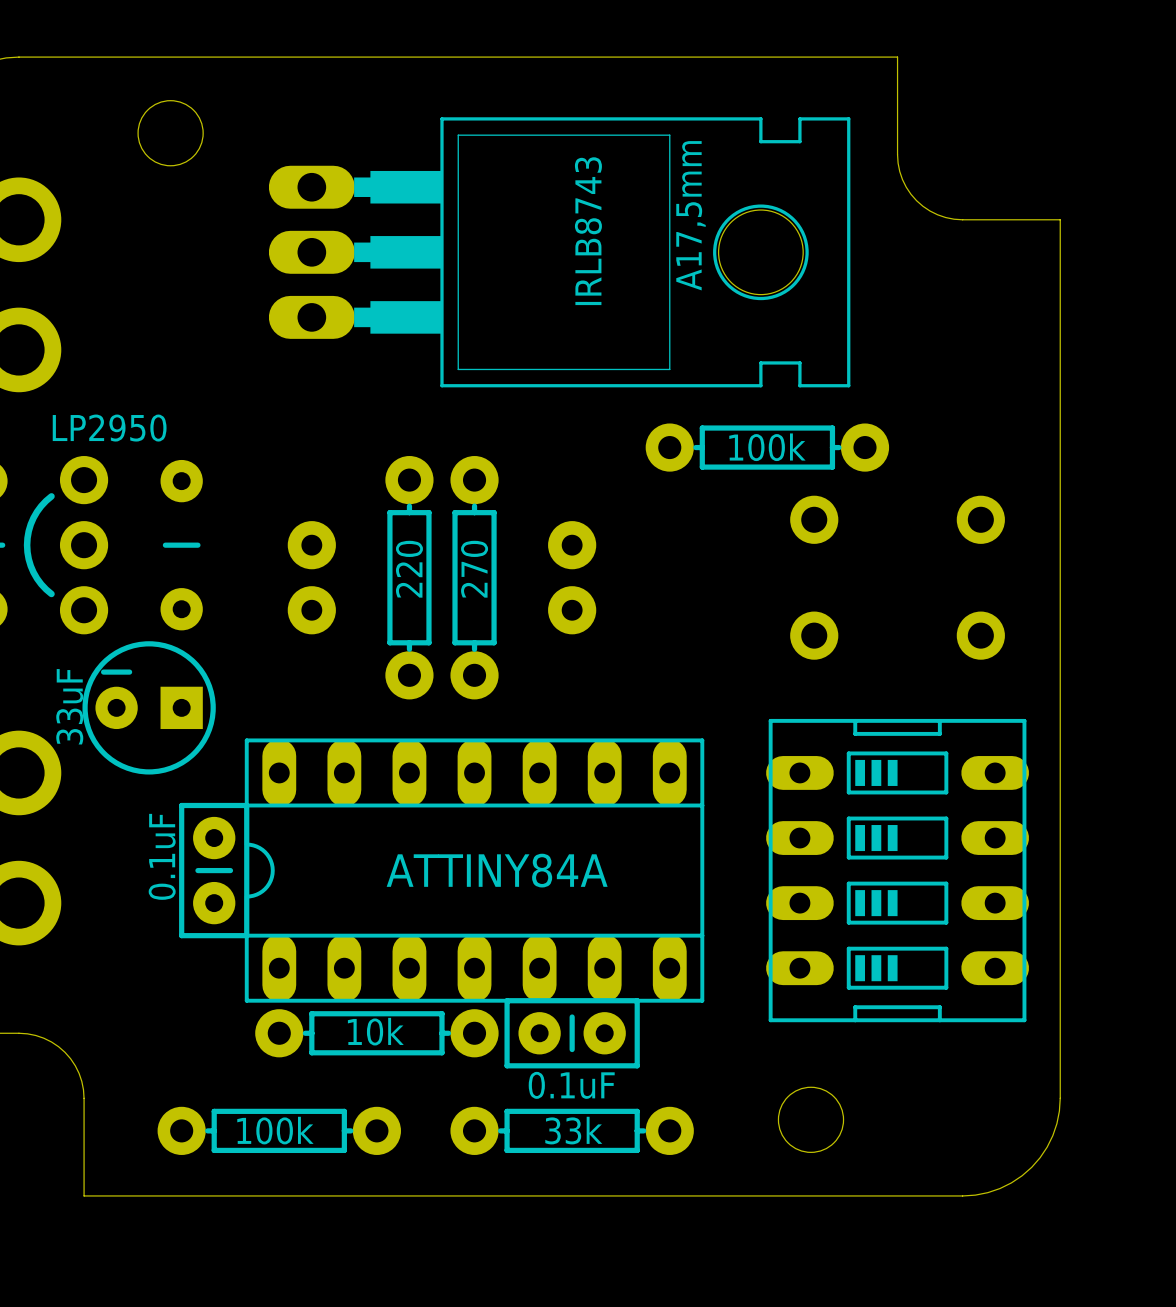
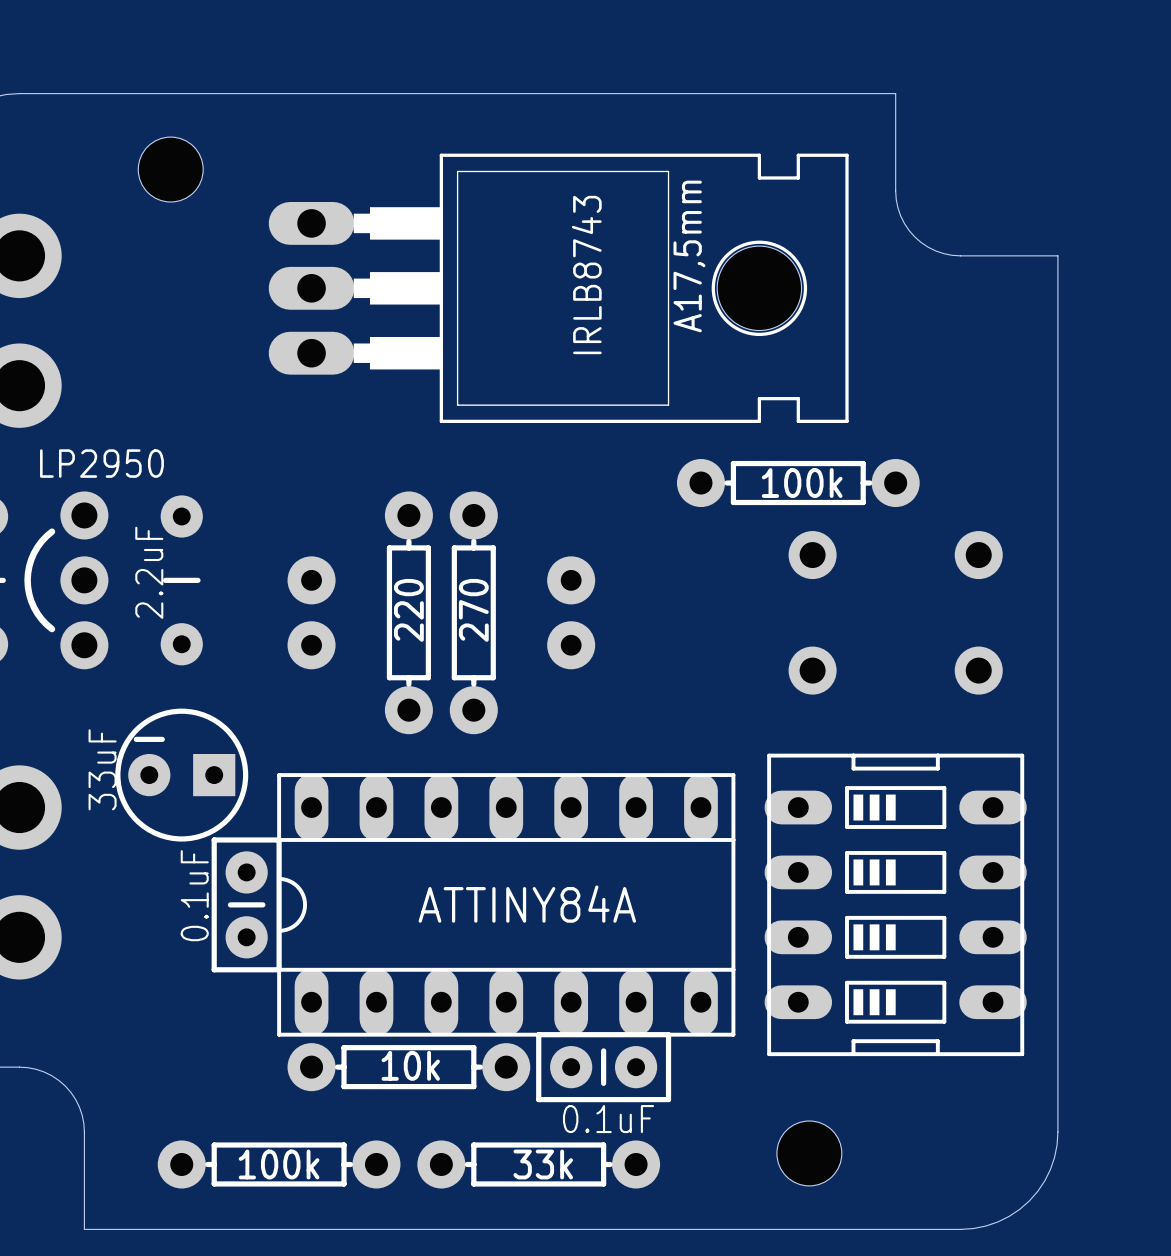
part position: (767, 447) -> (798, 483)
part value: none -> 2.2uF (149, 572)
part position: (149, 707) -> (181, 775)
part position: (214, 870) -> (246, 904)
ATTINY84A position: (474, 870) -> (506, 904)
part position: (376, 1033) -> (408, 1067)
part position: (572, 1033) -> (603, 1067)
part position: (572, 1130) -> (538, 1164)

